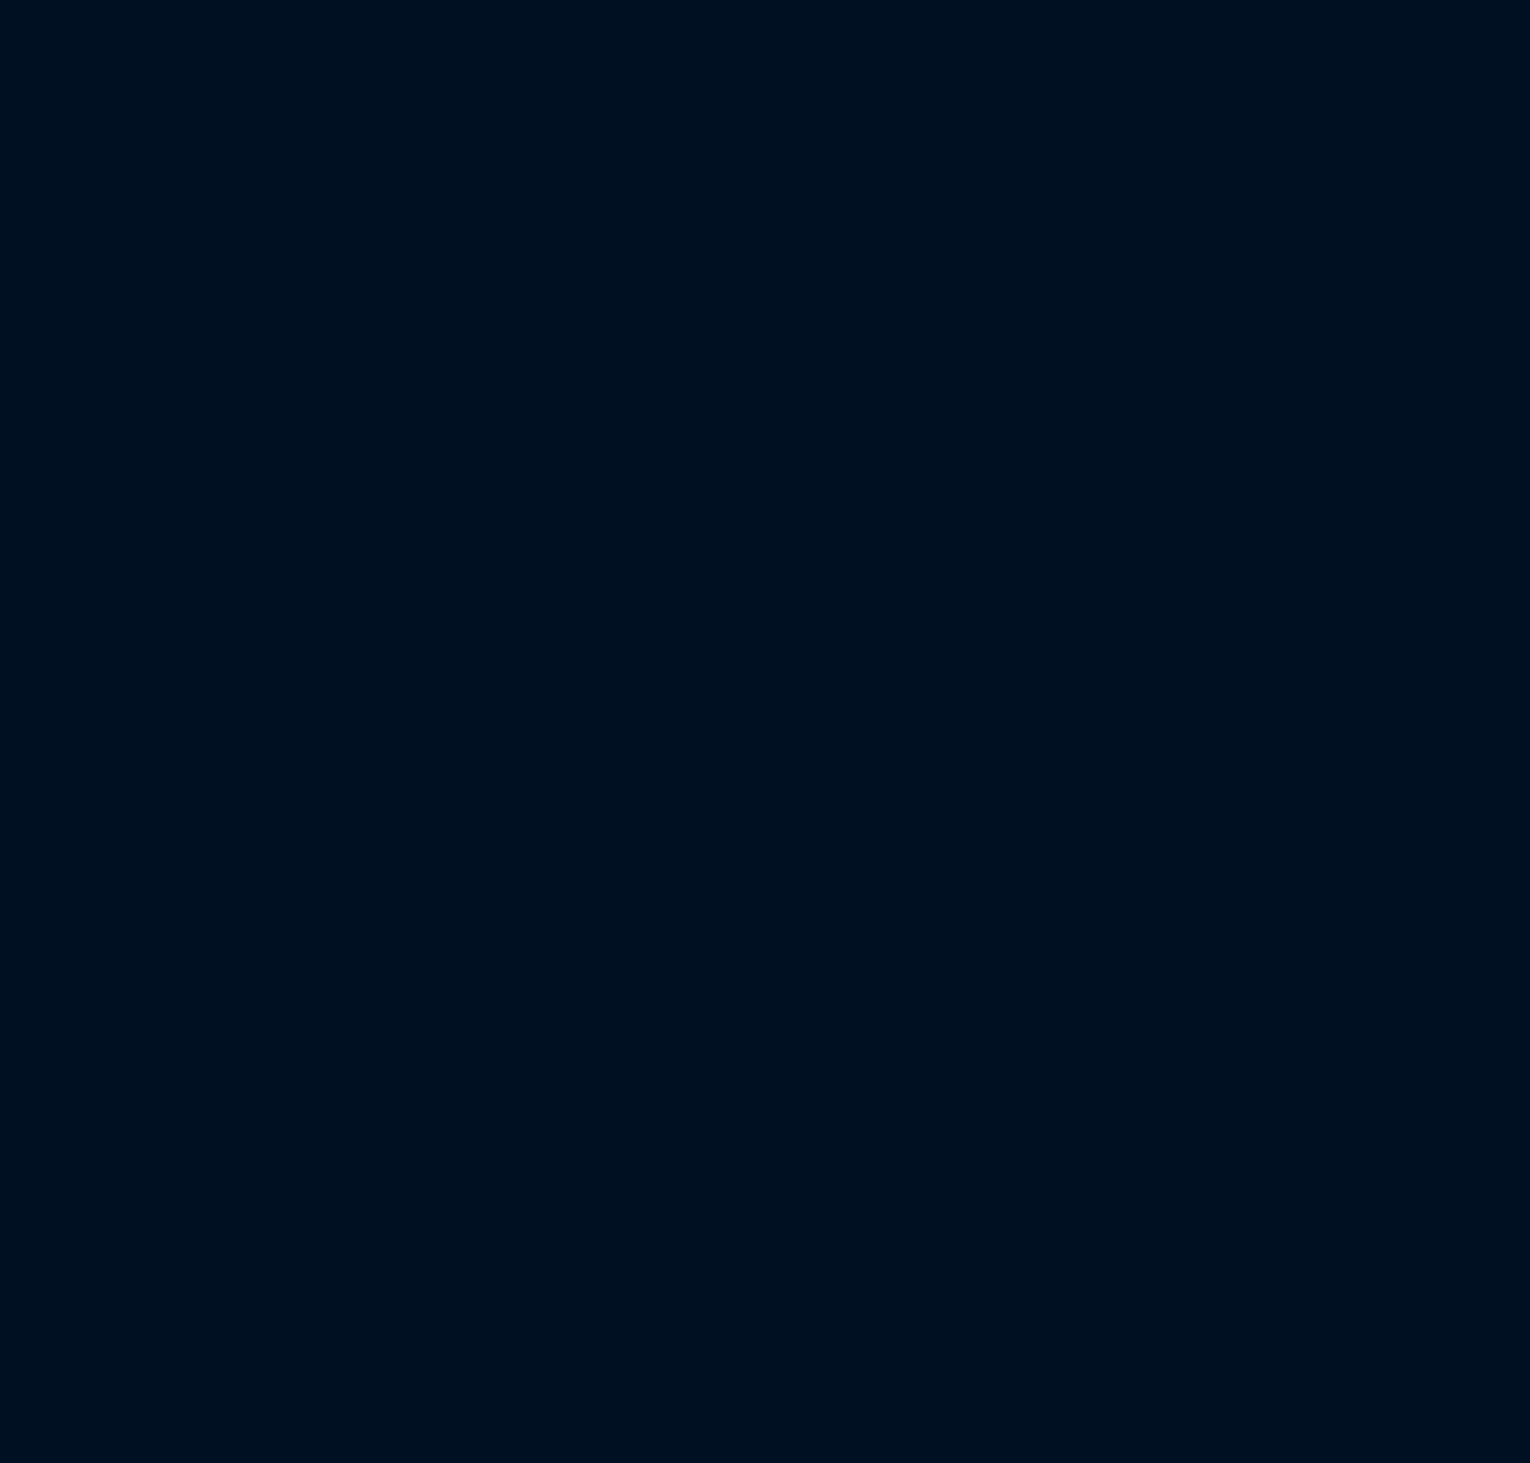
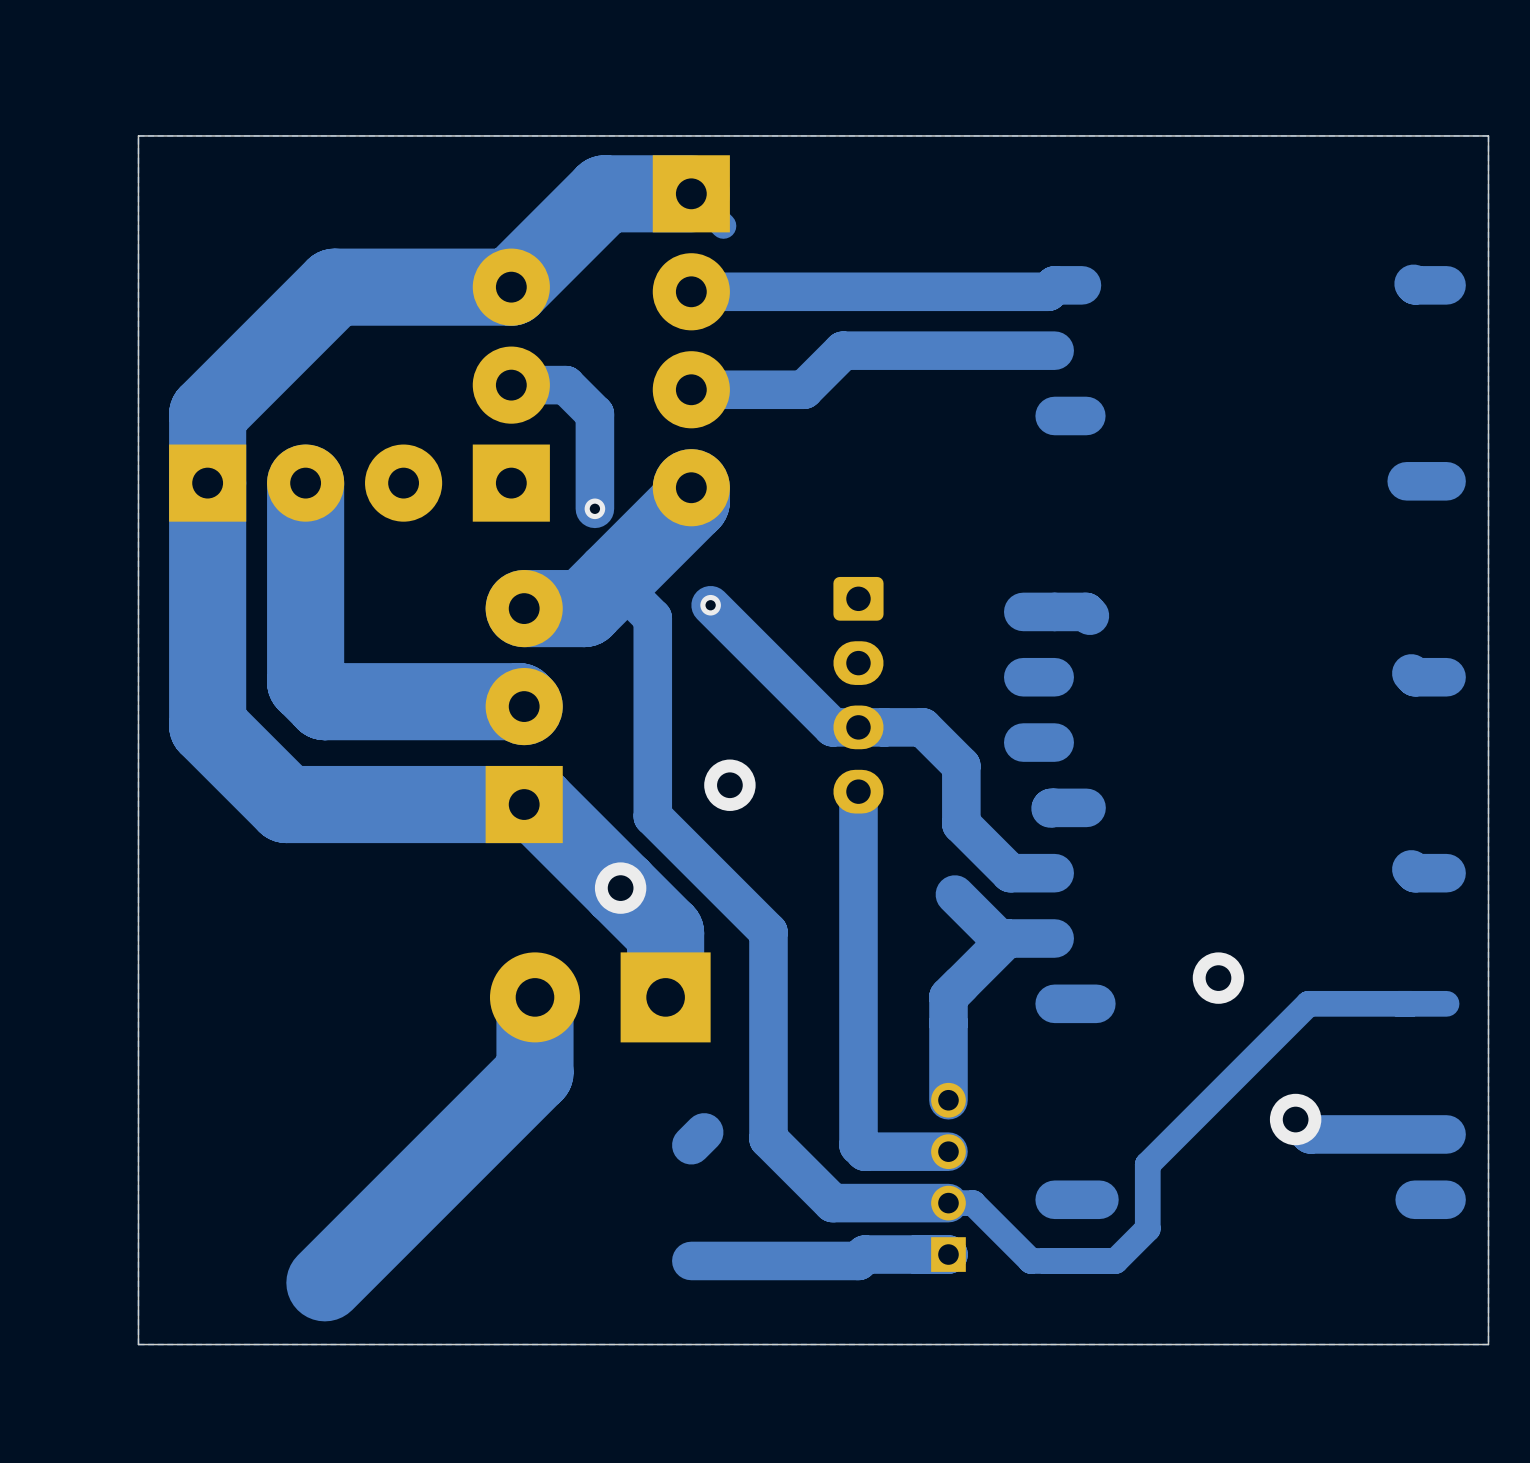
board edge: none -> (1488, 135) (1488, 1344) (138, 1344) (138, 135) (1488, 135)
track: none -> (723, 225) (691, 193) (604, 193) (511, 287) (334, 287) (207, 414) (207, 725) (286, 804) (537, 804) (665, 933) (665, 997)
track: none -> (1413, 283) (1446, 285)
track: none -> (1081, 285) (1054, 285) (1048, 291) (691, 291)
part: none -> (691, 340)
track: none -> (1054, 350) (843, 350) (803, 389) (691, 389)
track: none -> (511, 385) (565, 385) (594, 414) (594, 508)
part: none -> (511, 385)
track: none -> (1086, 415) (1054, 415)
track: none -> (1446, 481) (1406, 481)
track: none -> (305, 483) (305, 682) (324, 701)
part: none -> (305, 483)
track: none -> (691, 487) (691, 501) (584, 608) (524, 608)
via: none -> (594, 508)
track: none -> (613, 579) (652, 618) (652, 816) (768, 932) (768, 1138) (832, 1203) (973, 1203) (1030, 1260) (1115, 1260) (1147, 1228) (1147, 1164) (1308, 1003) (1446, 1003)
track: none -> (710, 605) (832, 727) (922, 727) (961, 765) (961, 824) (1010, 873) (1054, 873)
via: none -> (710, 605)
track: none -> (1023, 611) (1086, 611) (1089, 615)
track: none -> (1411, 673) (1415, 677) (1446, 677)
track: none -> (1054, 677) (1023, 677)
part: none -> (858, 695)
track: none -> (324, 701) (519, 701) (524, 706)
part: none -> (524, 706)
track: none -> (1054, 742) (1023, 742)
via: none -> (729, 785)
track: none -> (858, 791) (858, 1145) (864, 1151) (948, 1151)
track: none -> (1086, 807) (1050, 808)
track: none -> (1411, 869) (1415, 873) (1446, 873)
via: none -> (620, 888)
track: none -> (954, 894) (998, 938) (1054, 938)
track: none -> (1006, 938) (948, 996) (948, 1100)
via: none -> (1218, 978)
track: none -> (534, 997) (534, 1072) (324, 1282)
part: none -> (600, 997)
track: none -> (1096, 1003) (1054, 1003)
track: none -> (1295, 1119) (1310, 1134) (1446, 1134)
via: none -> (1295, 1119)
track: none -> (704, 1132) (691, 1145)
part: none -> (948, 1177)
track: none -> (1099, 1199) (1054, 1199)
track: none -> (1446, 1199) (1414, 1199)
track: none -> (948, 1254) (864, 1254) (858, 1260) (691, 1260)

